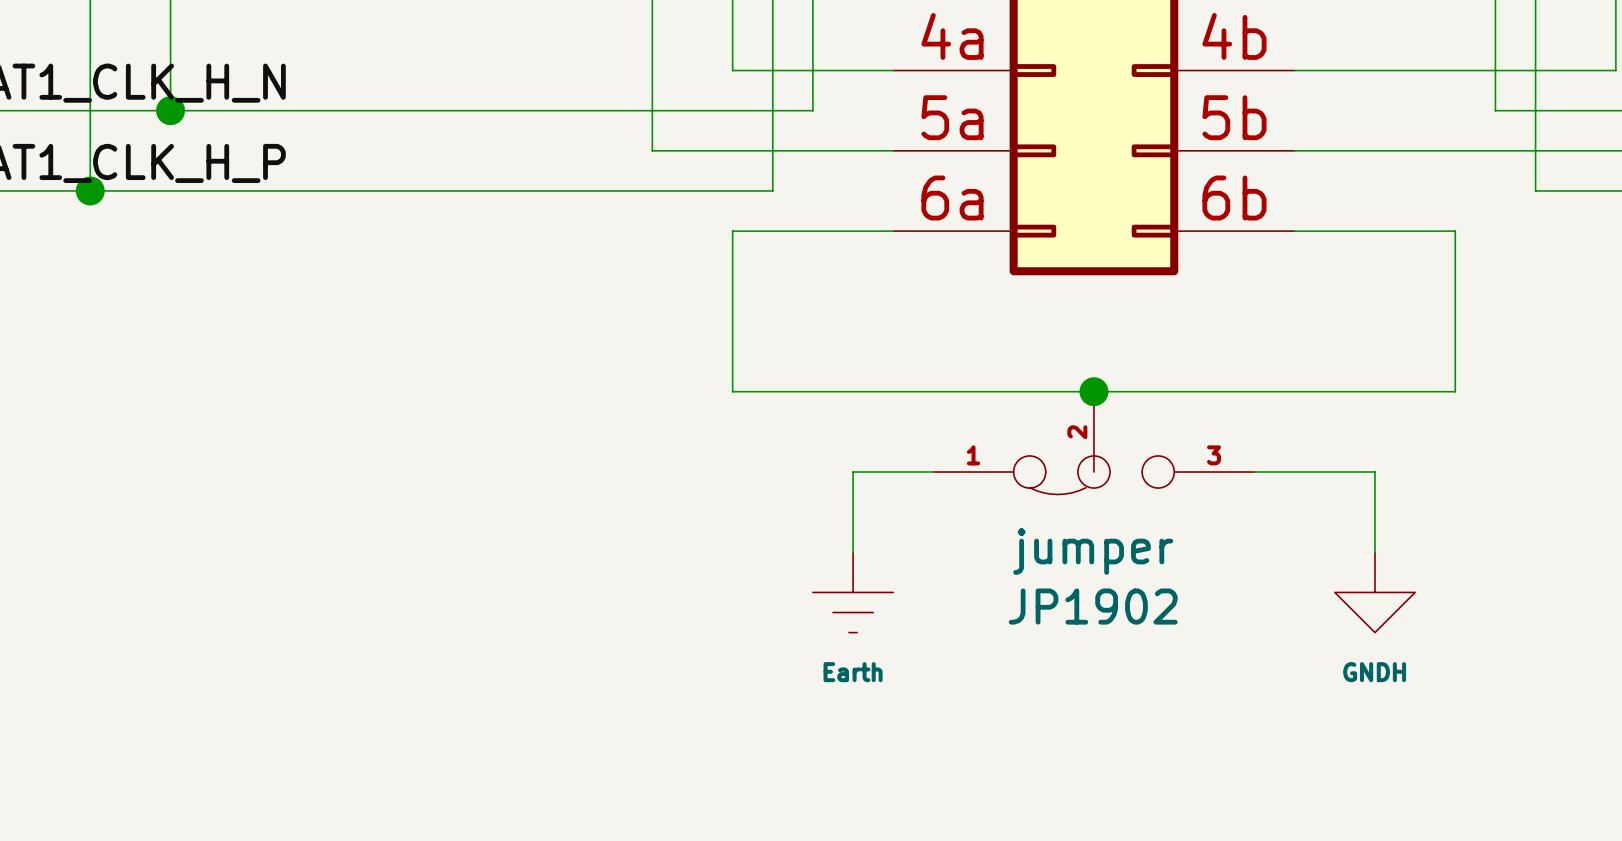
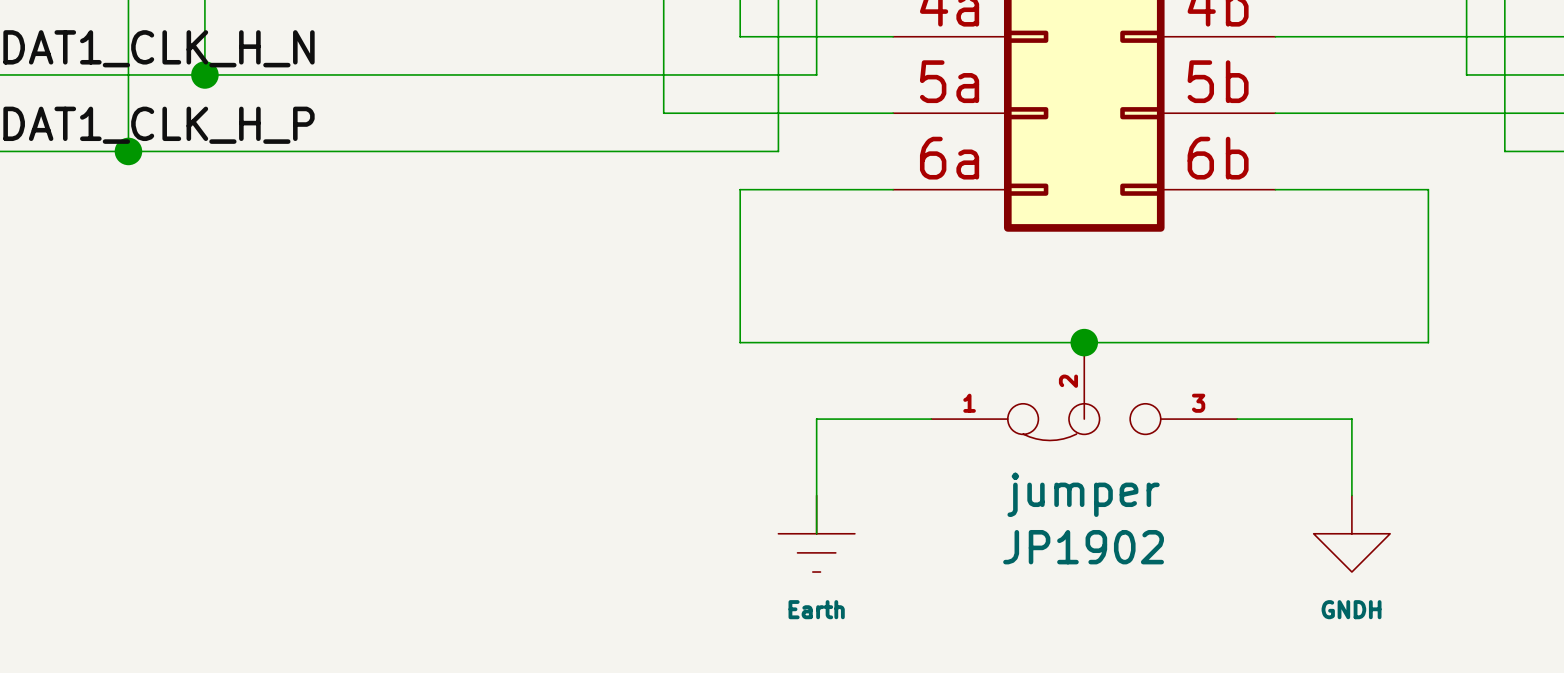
wire: (853, 472) (853, 552) -> (854, 419) (816, 419) (816, 533)
power symbol position: Earth (853, 592) -> Earth (816, 533)

